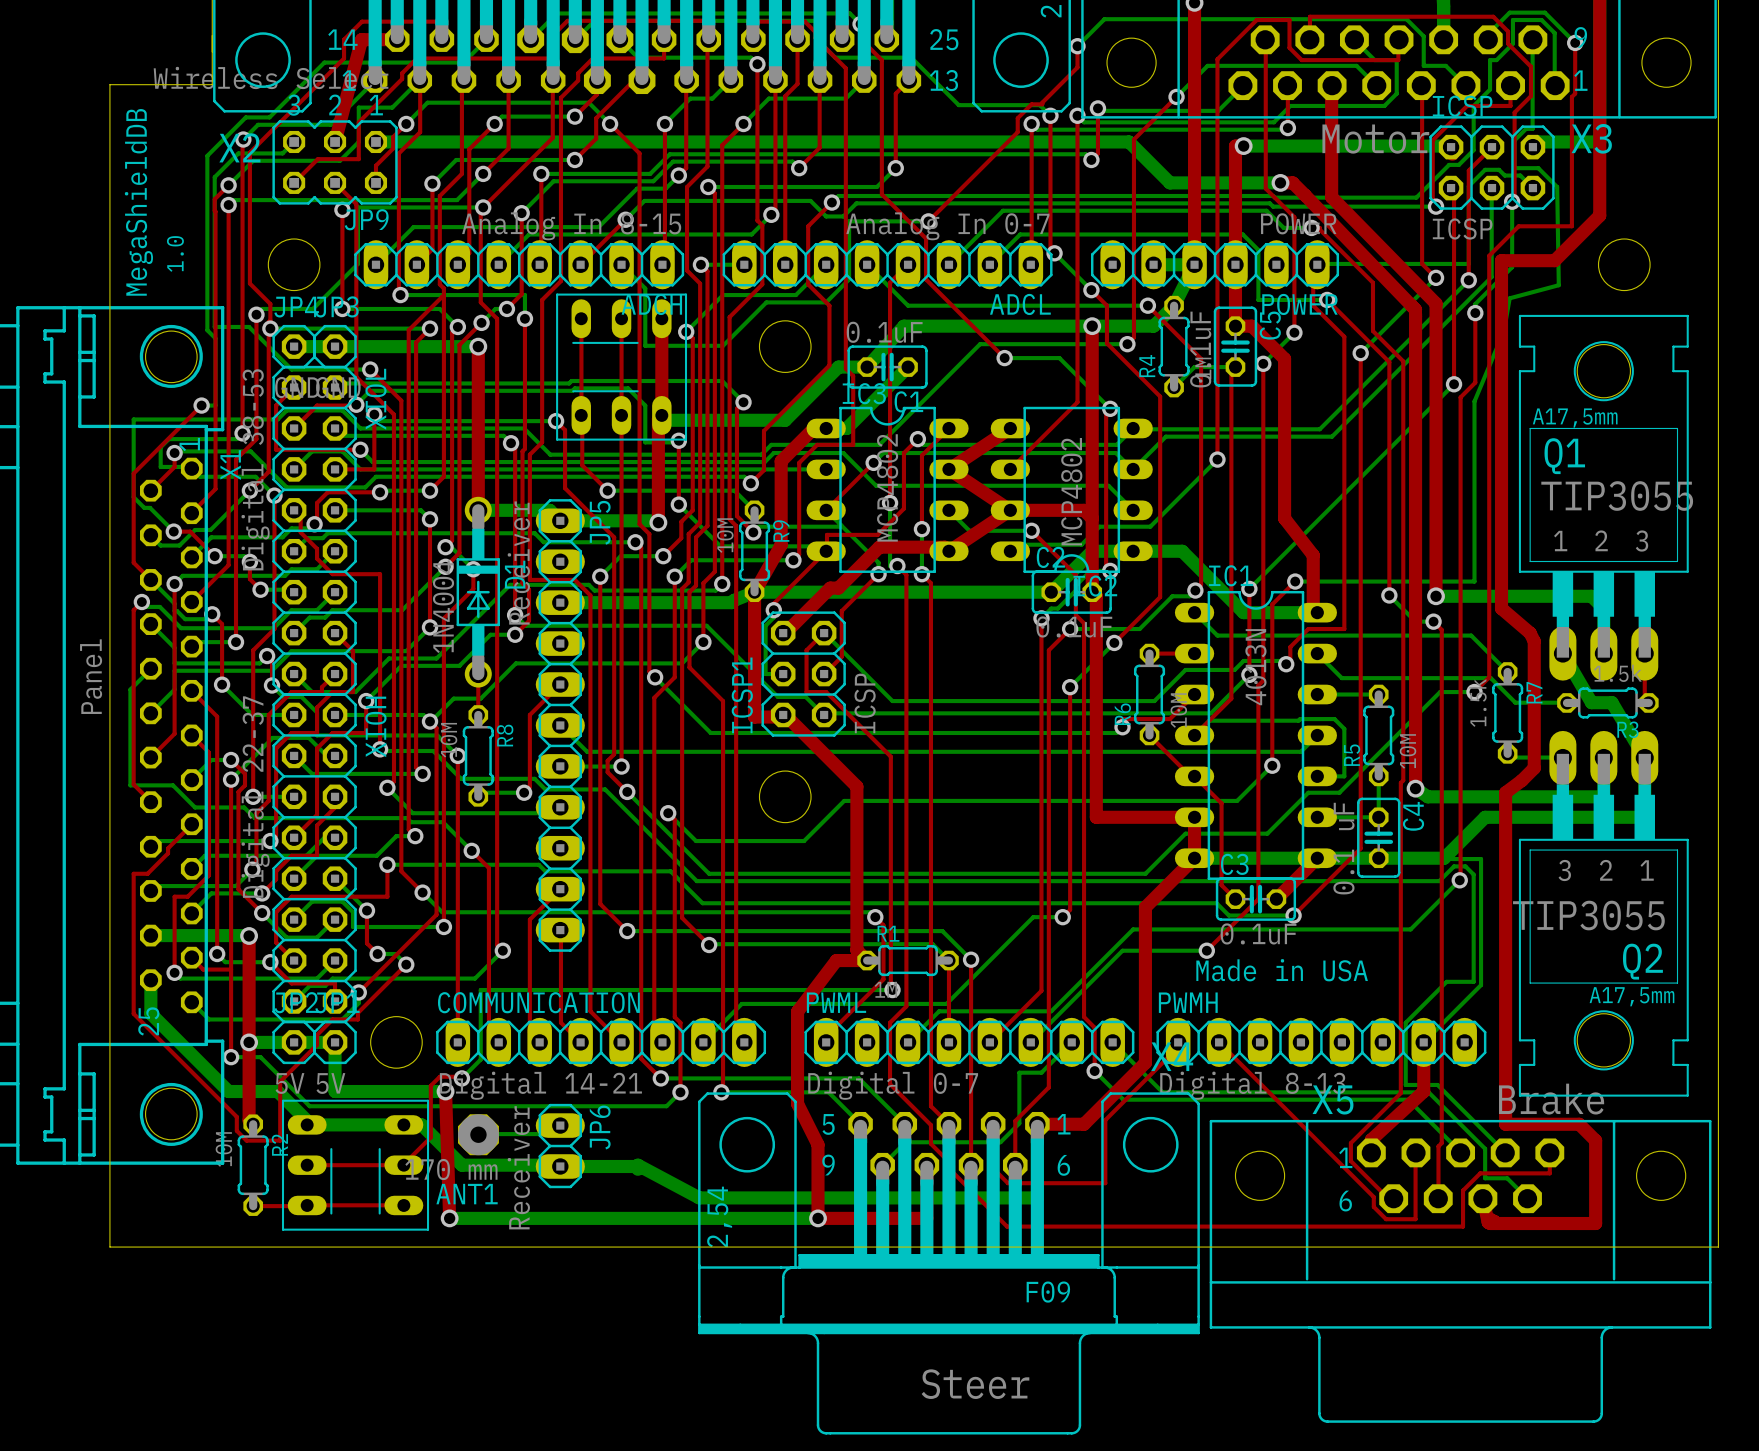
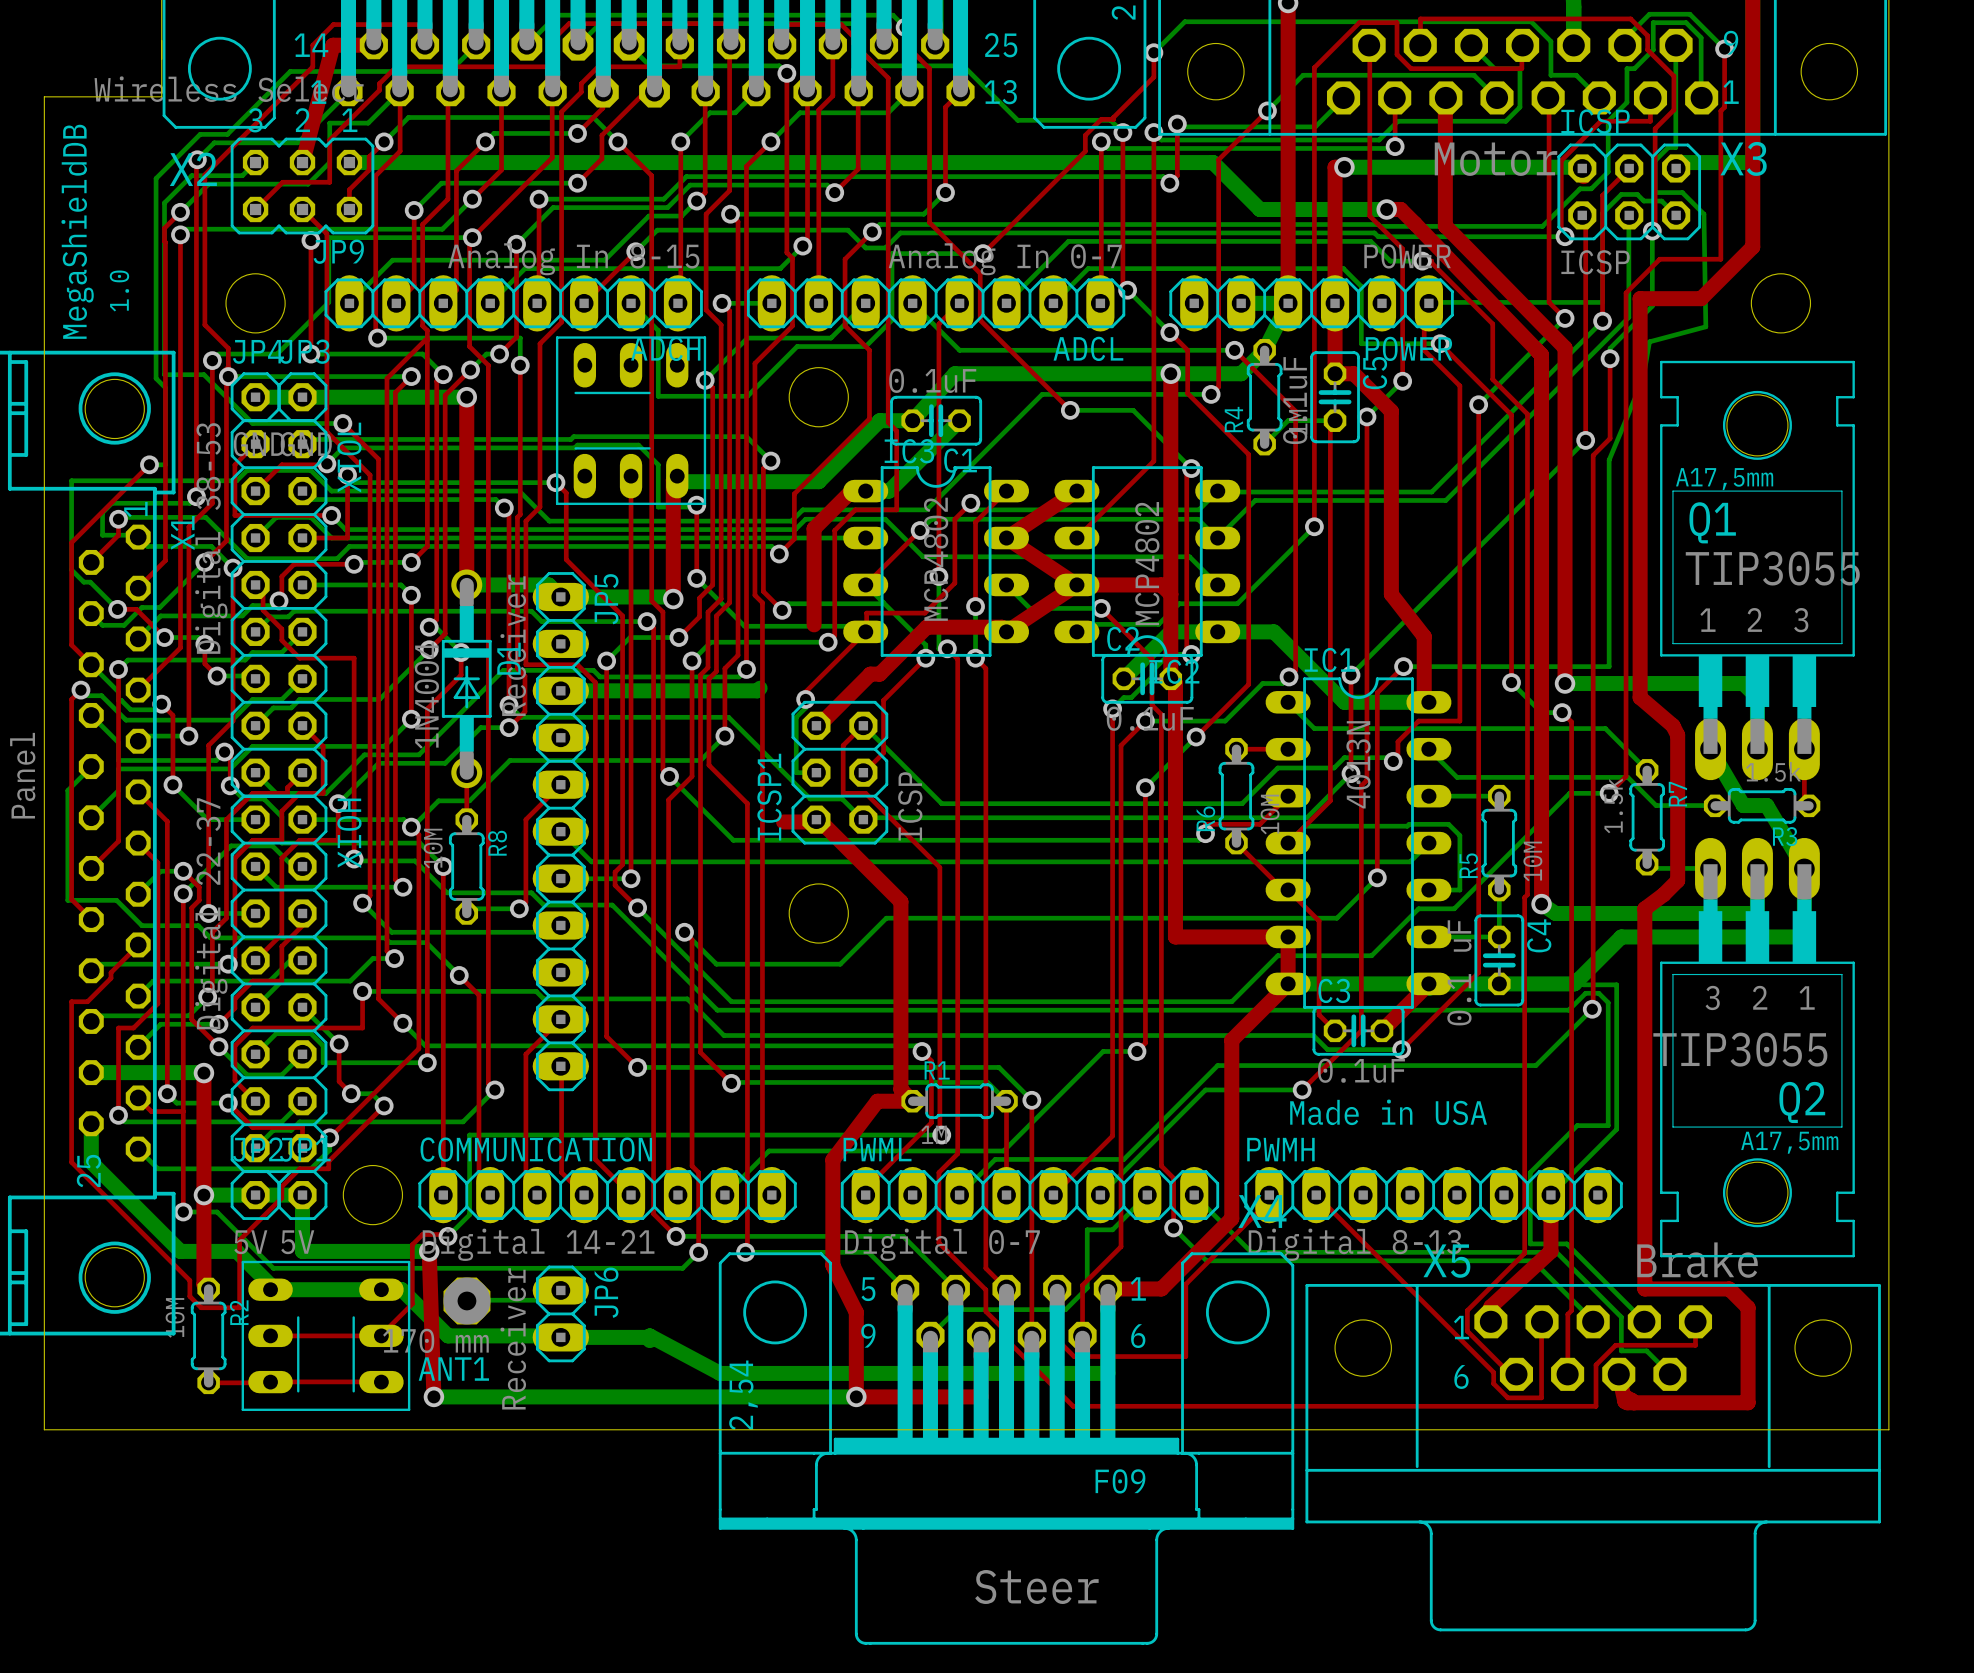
top track: (581, 318) (581, 415) -> none
top track: (621, 318) (621, 415) -> none
top track: (661, 318) (661, 415) -> none
top track: (582, 417) (582, 465) (607, 490) -> none
bottom track: (607, 490) (734, 490) (754, 510) -> none
via: (607, 490) -> none
top track: (781, 545) (754, 592) (754, 717) -> none
R9: 10M (754, 551) -> none
bottom track: (1051, 592) (754, 592) (734, 600) -> none

